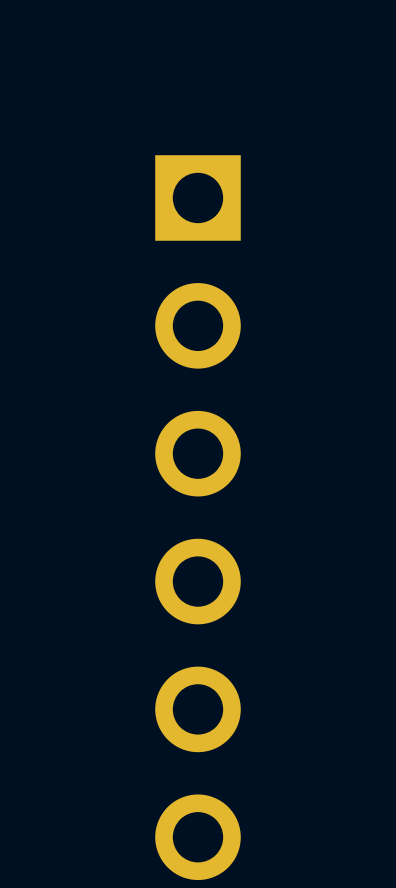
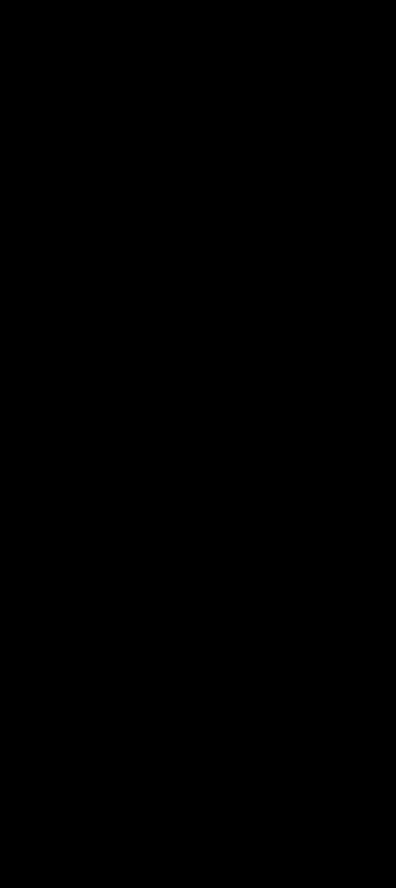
part: (197, 517) -> none

